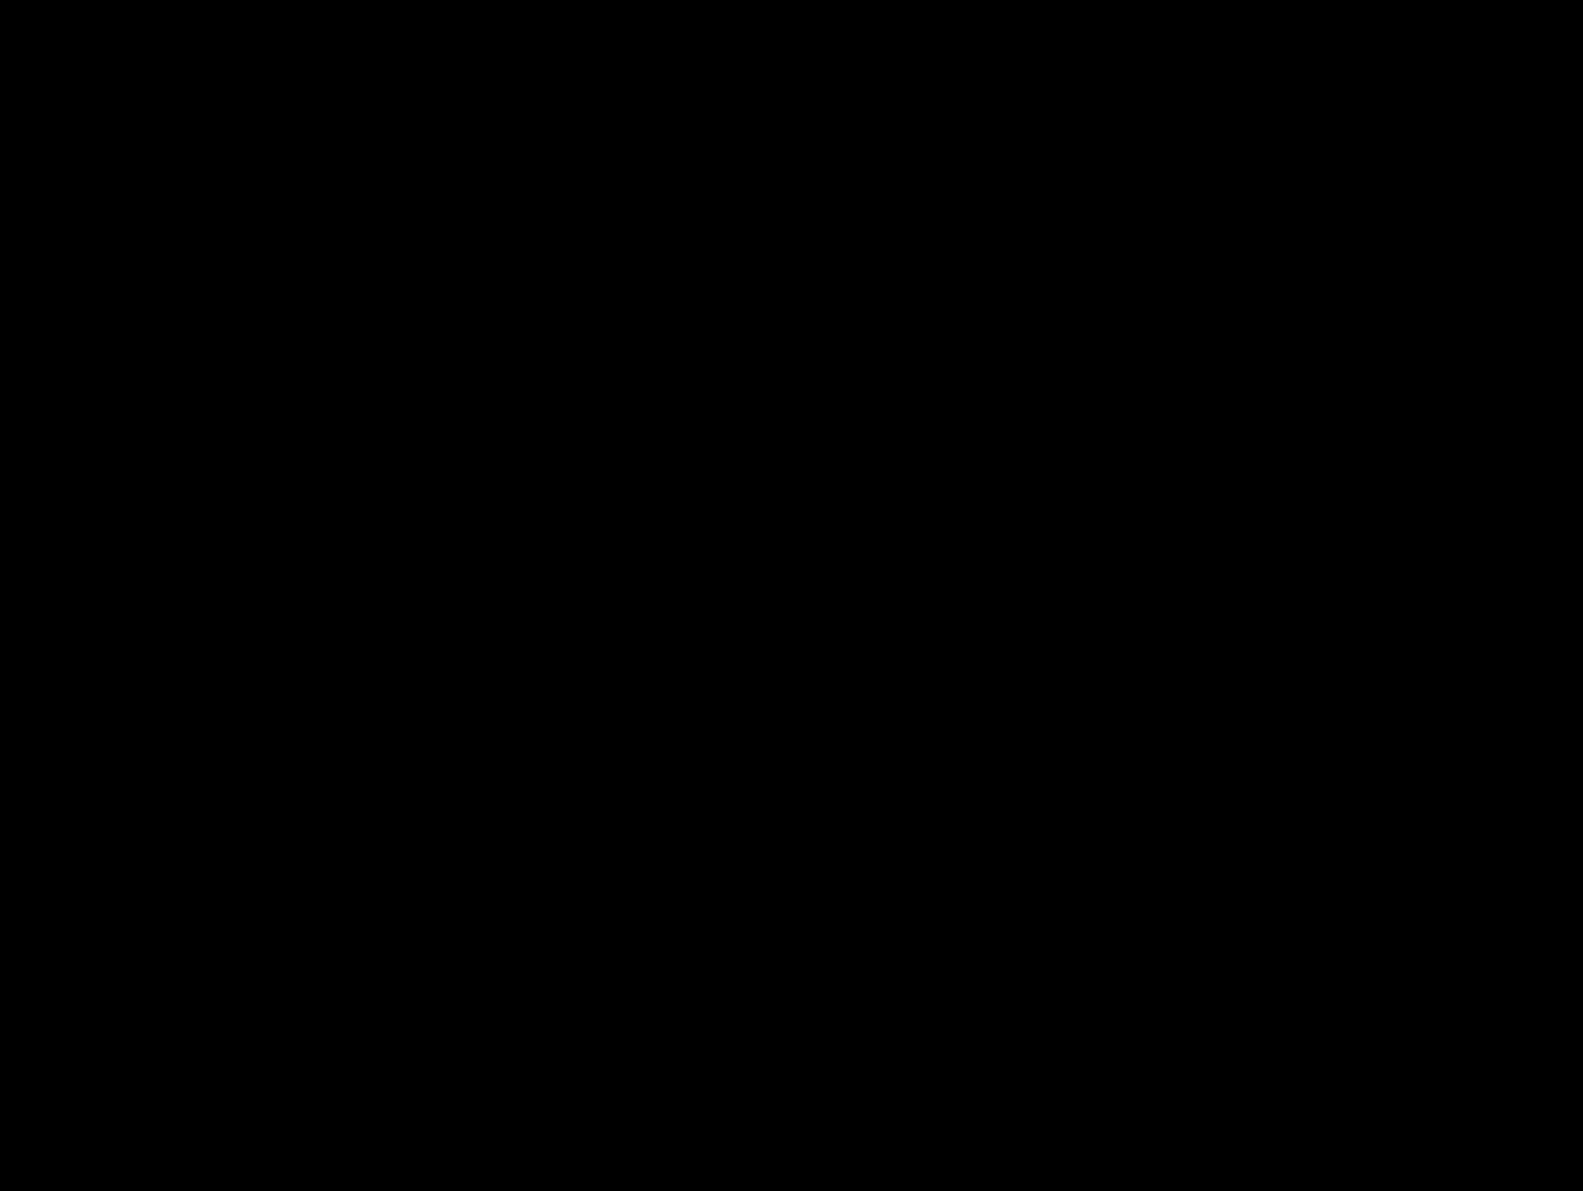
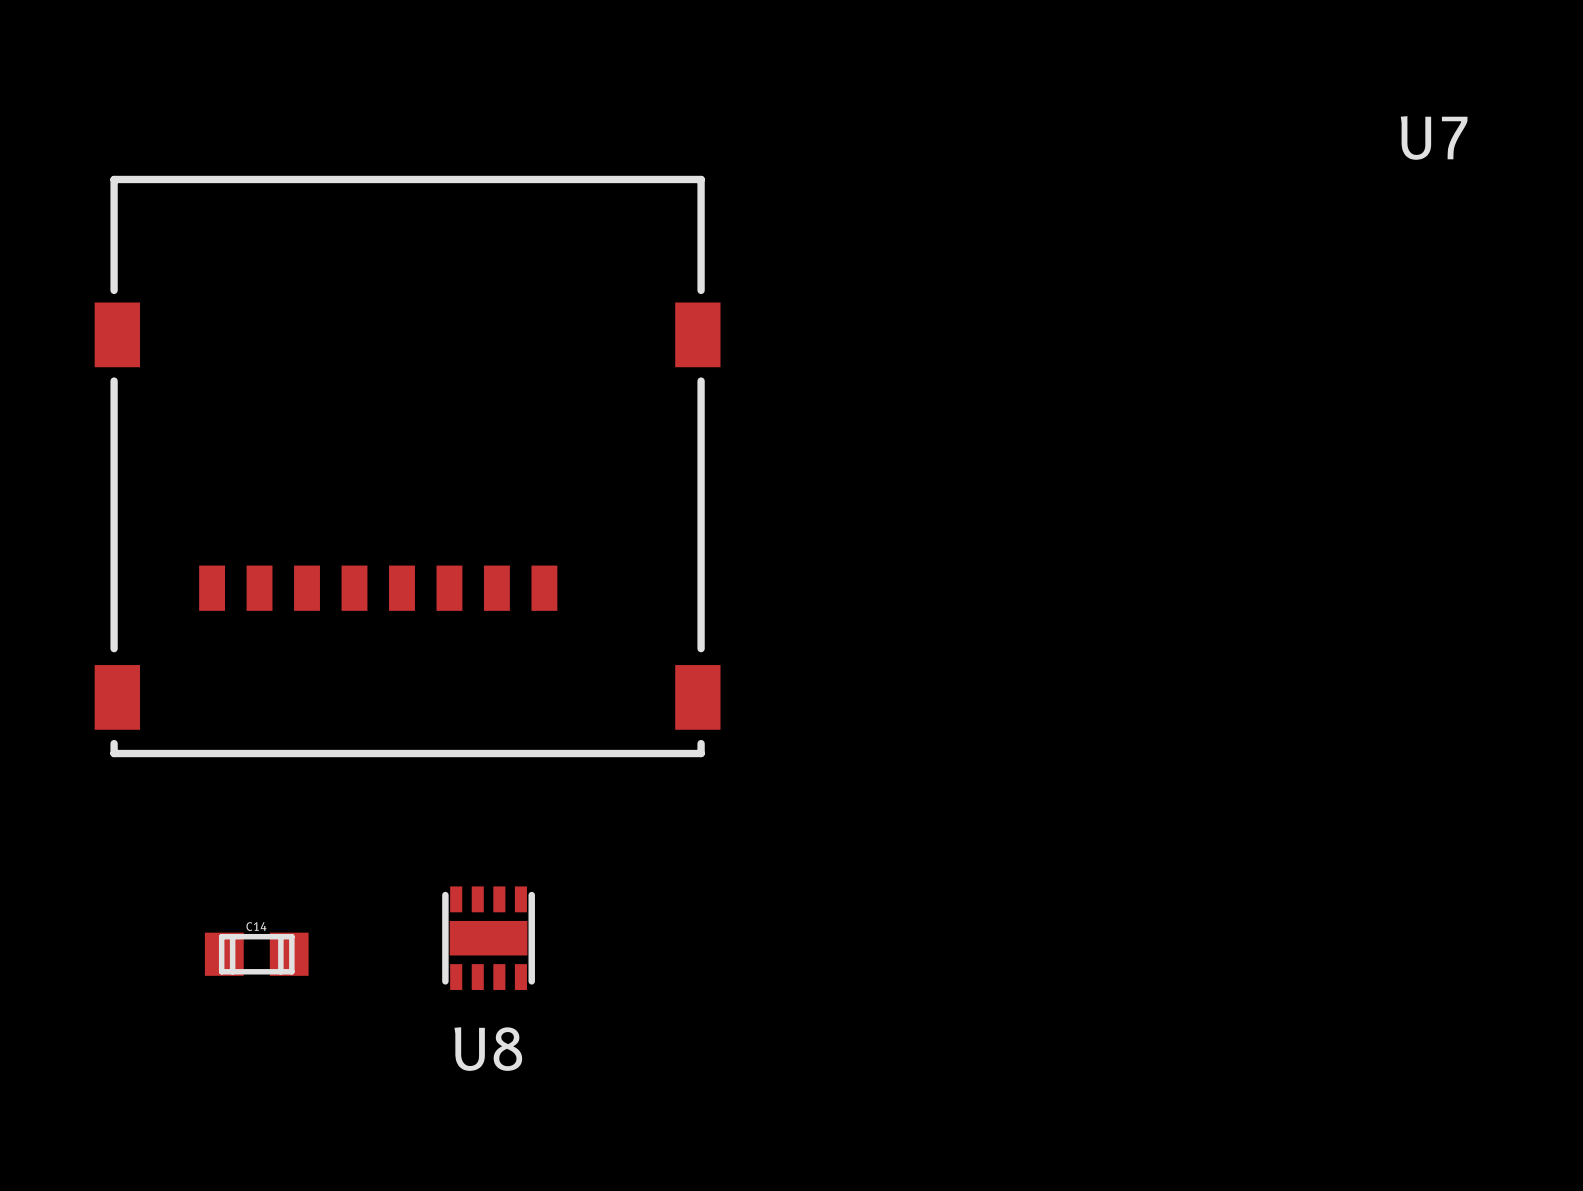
U7: none -> (407, 466)
U8: none -> (488, 938)
C14: none -> (256, 954)

